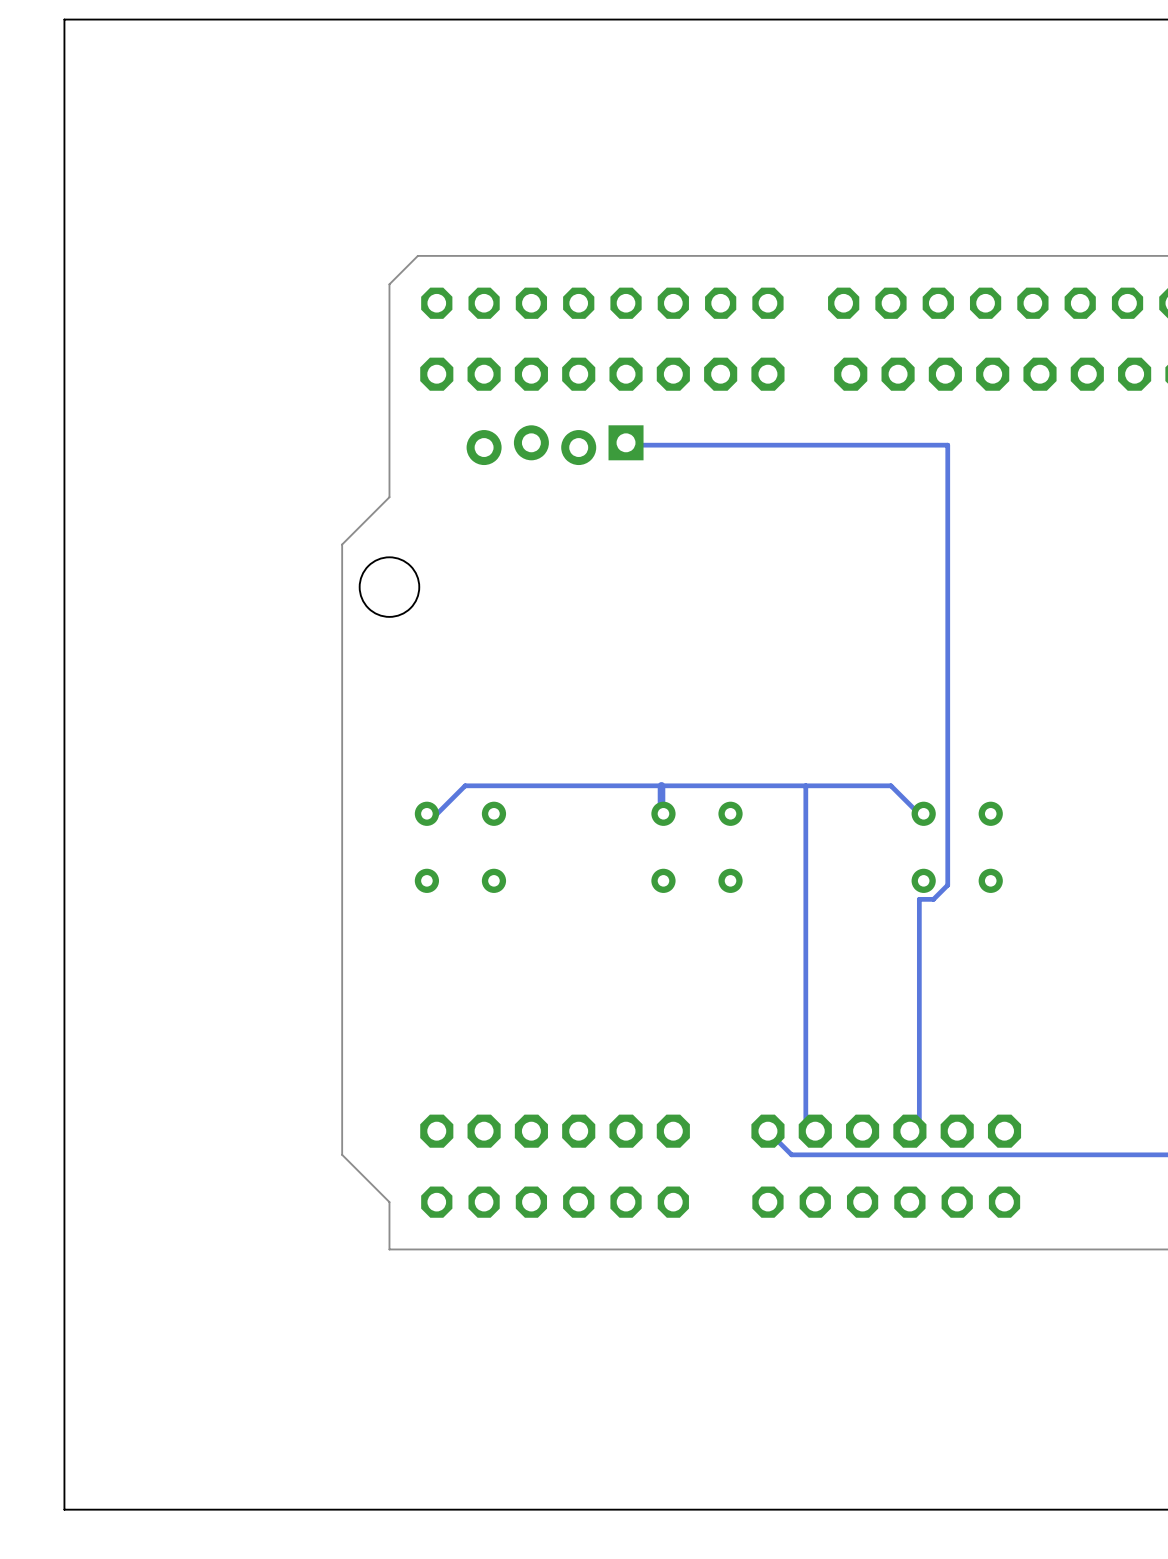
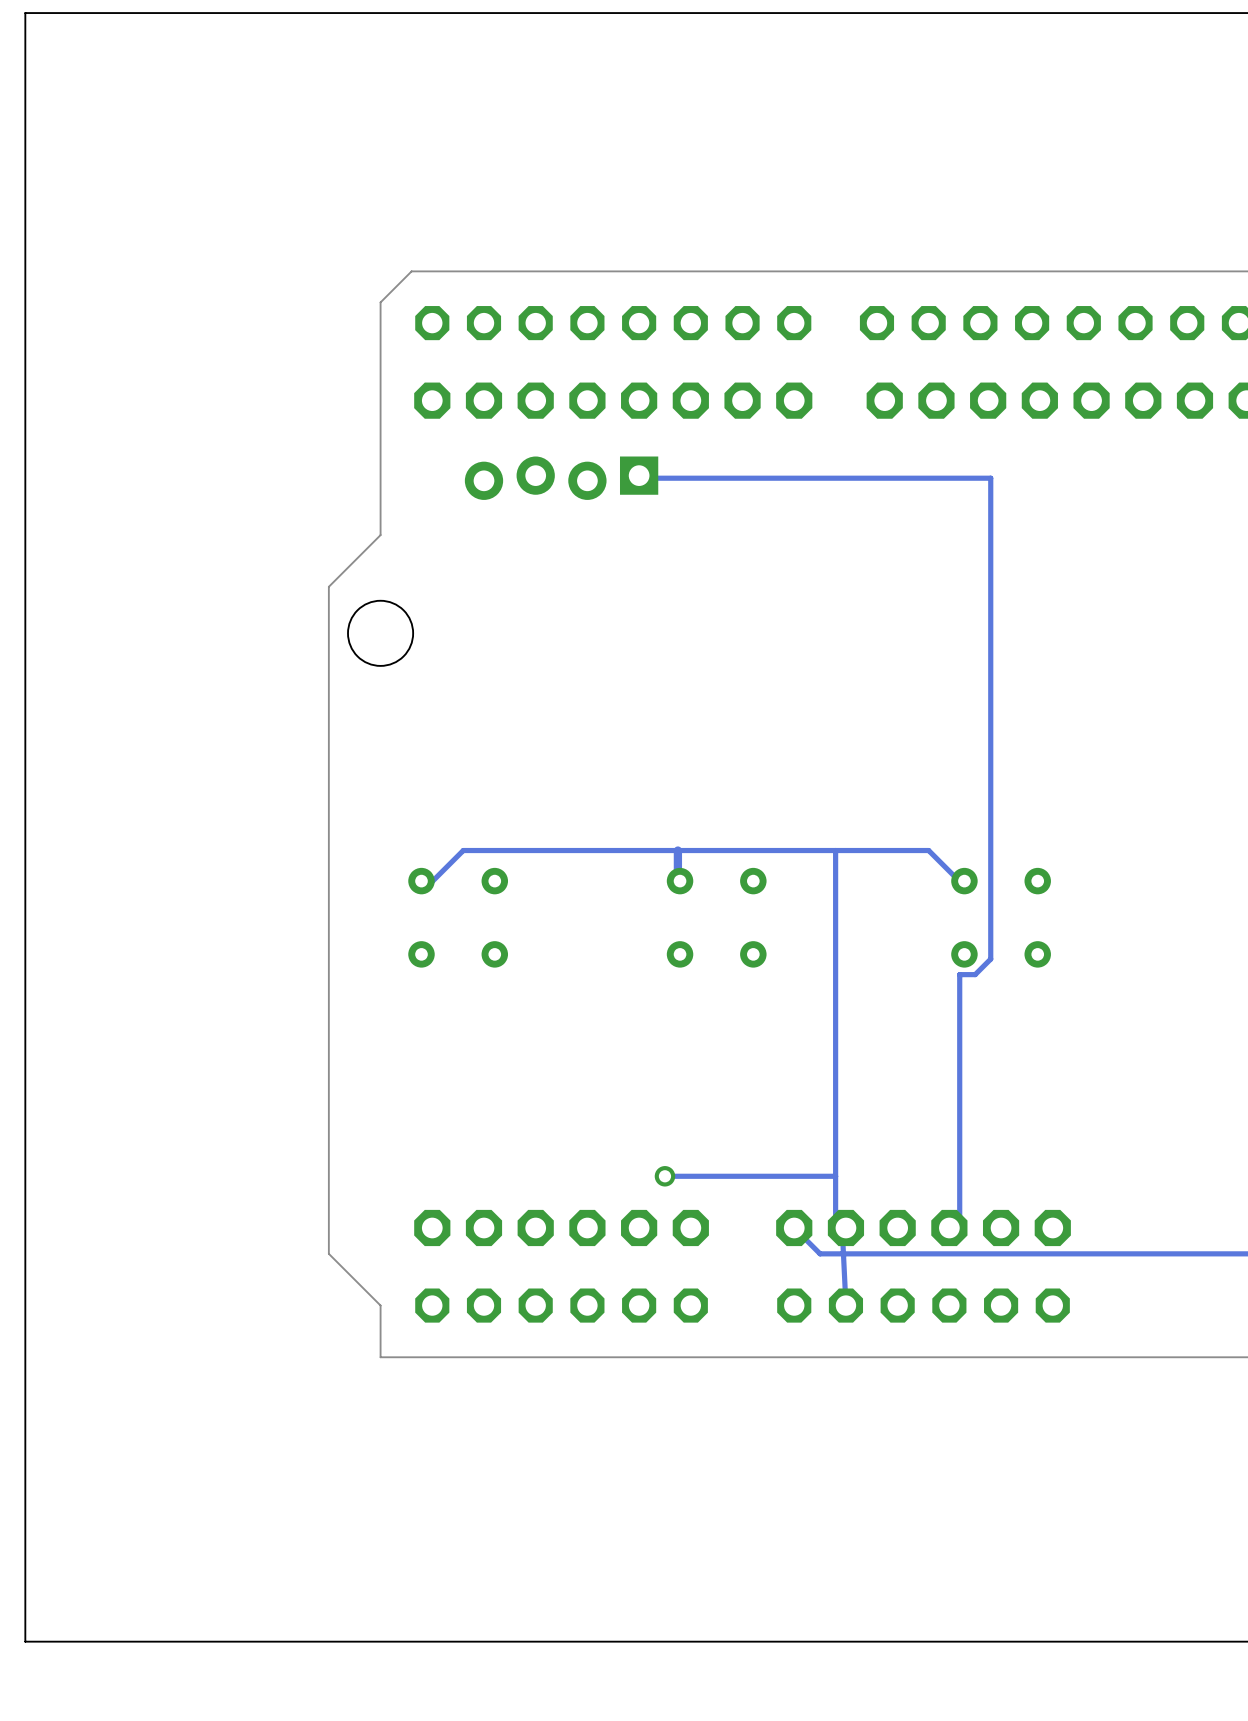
via: none -> (664, 1176)
track: none -> (835, 1176) (667, 1176) (664, 1180) (664, 1176)
track: none -> (835, 1222) (842, 1225) (845, 1305)

